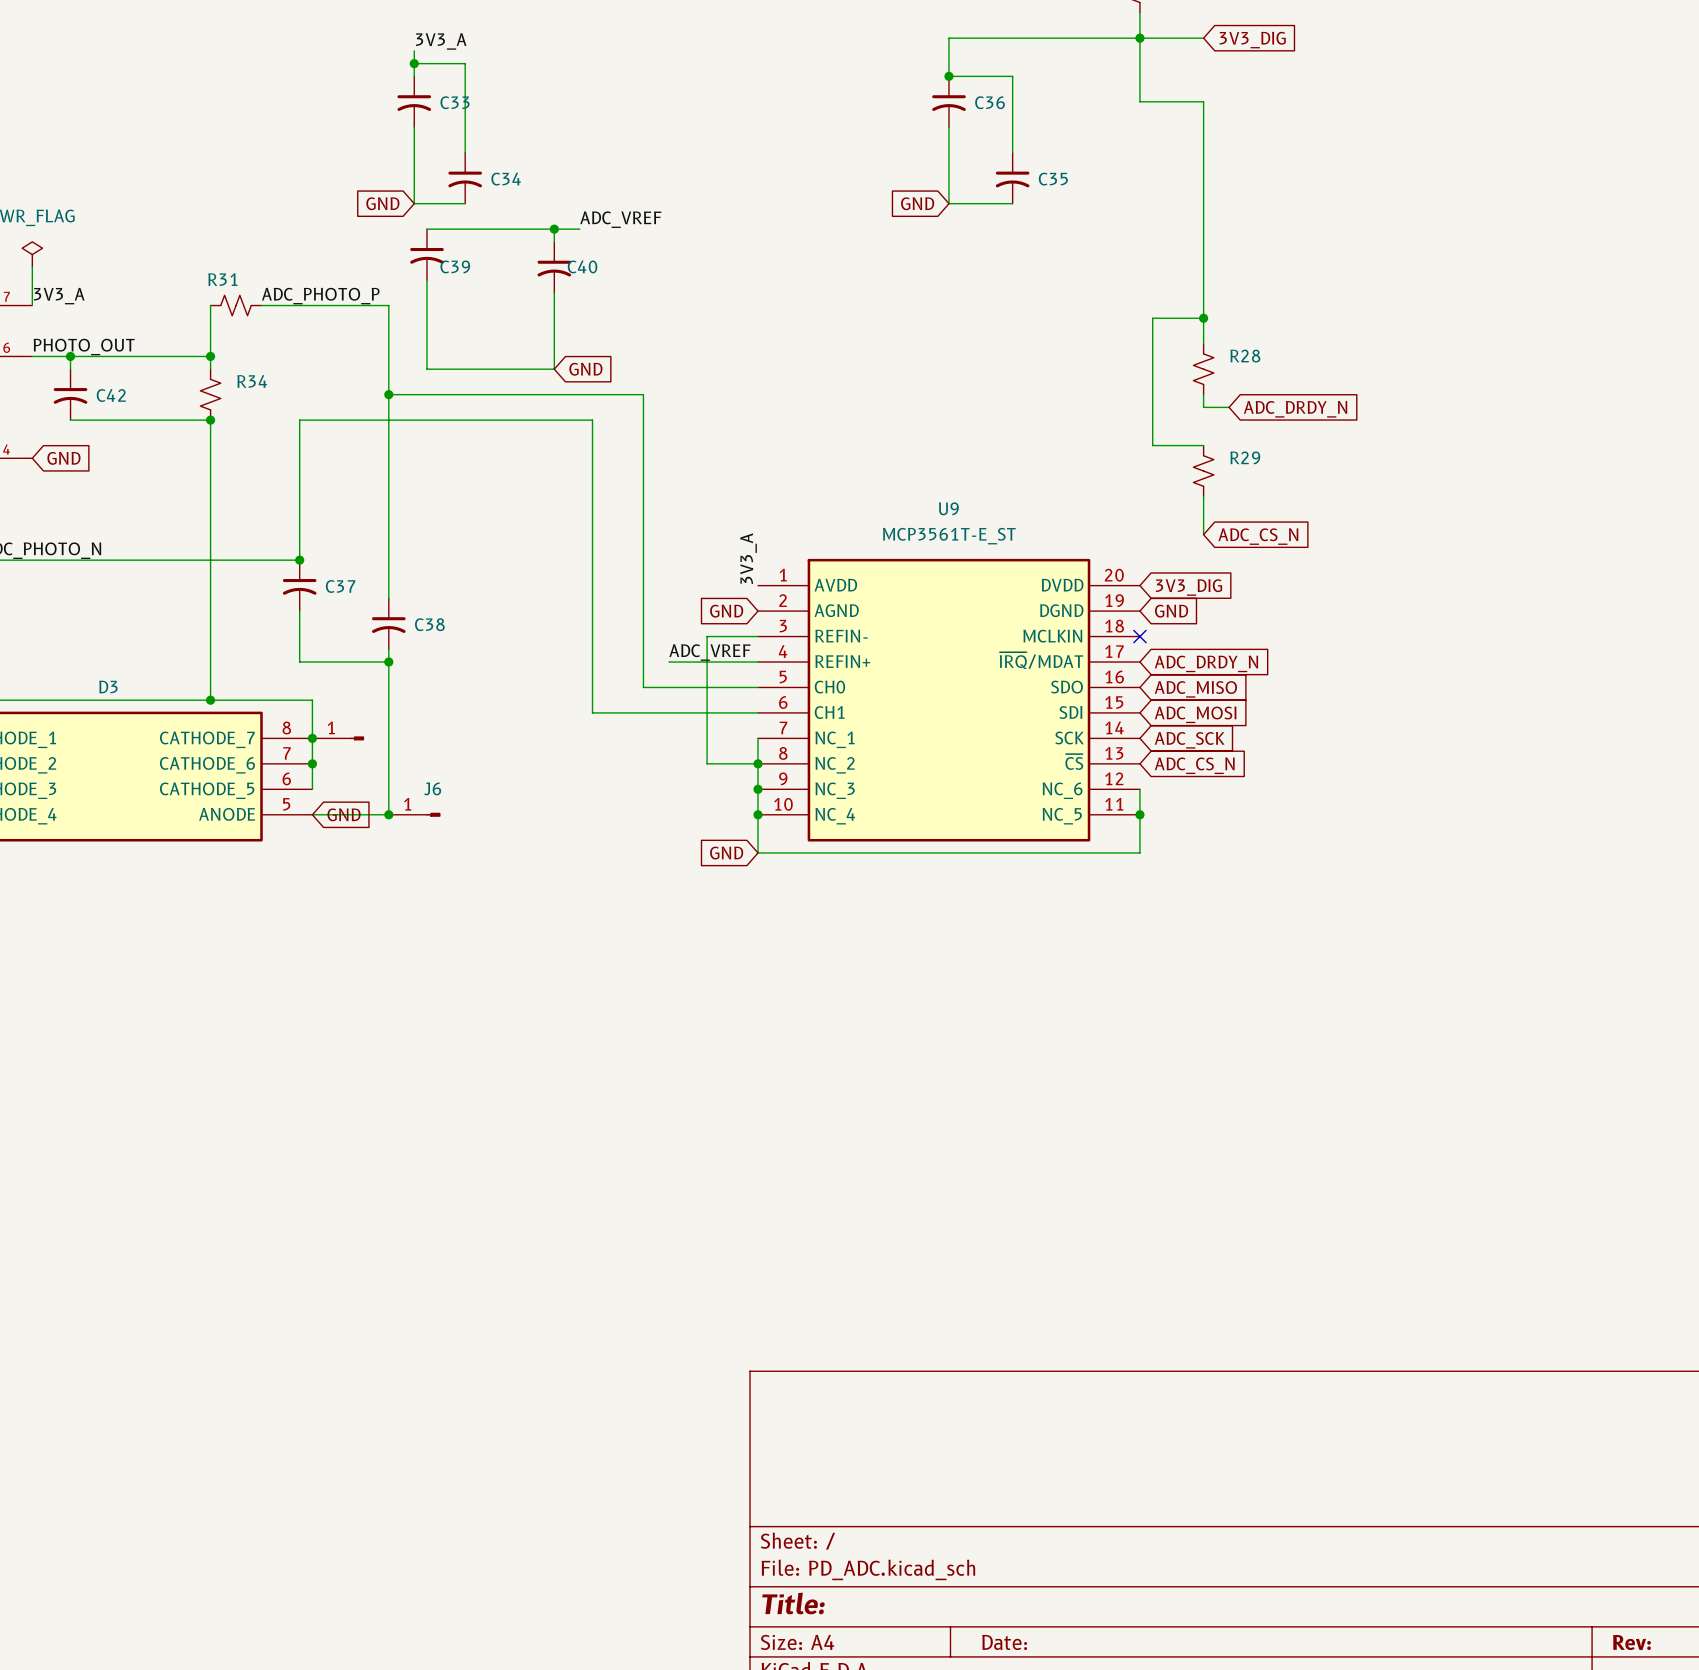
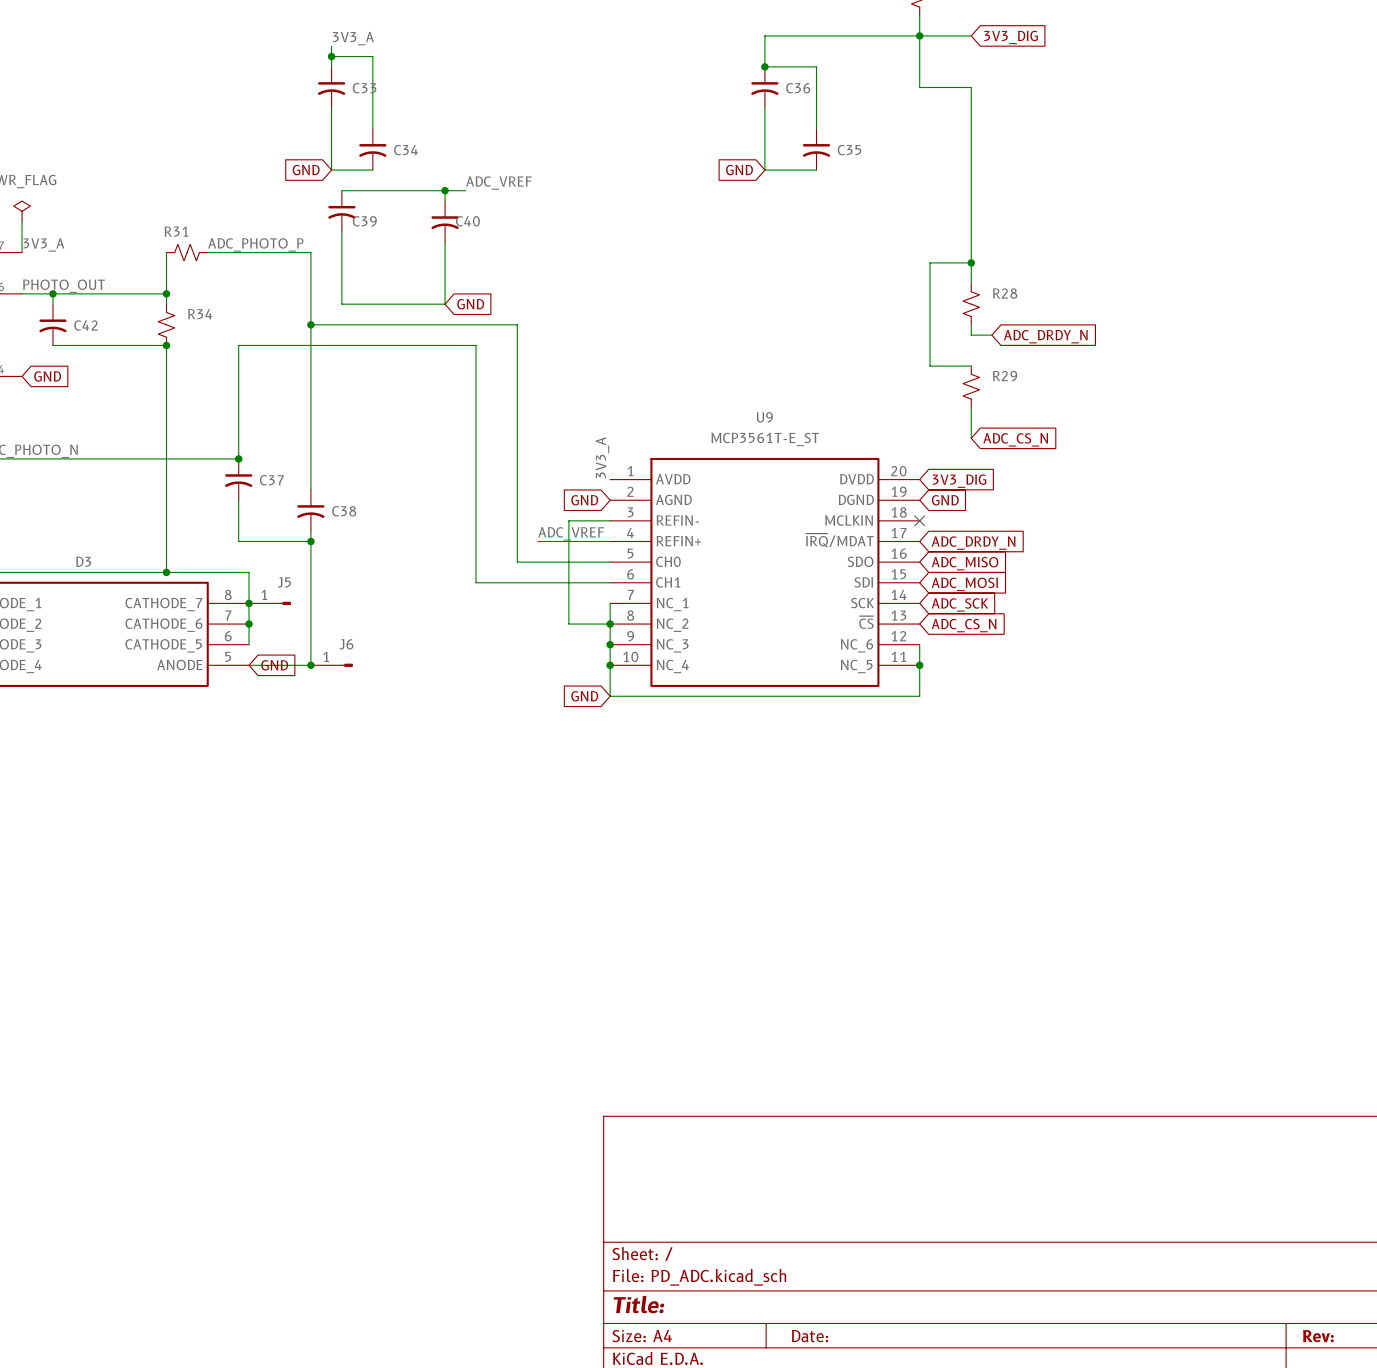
J5 name: none -> J5 (284, 582)

